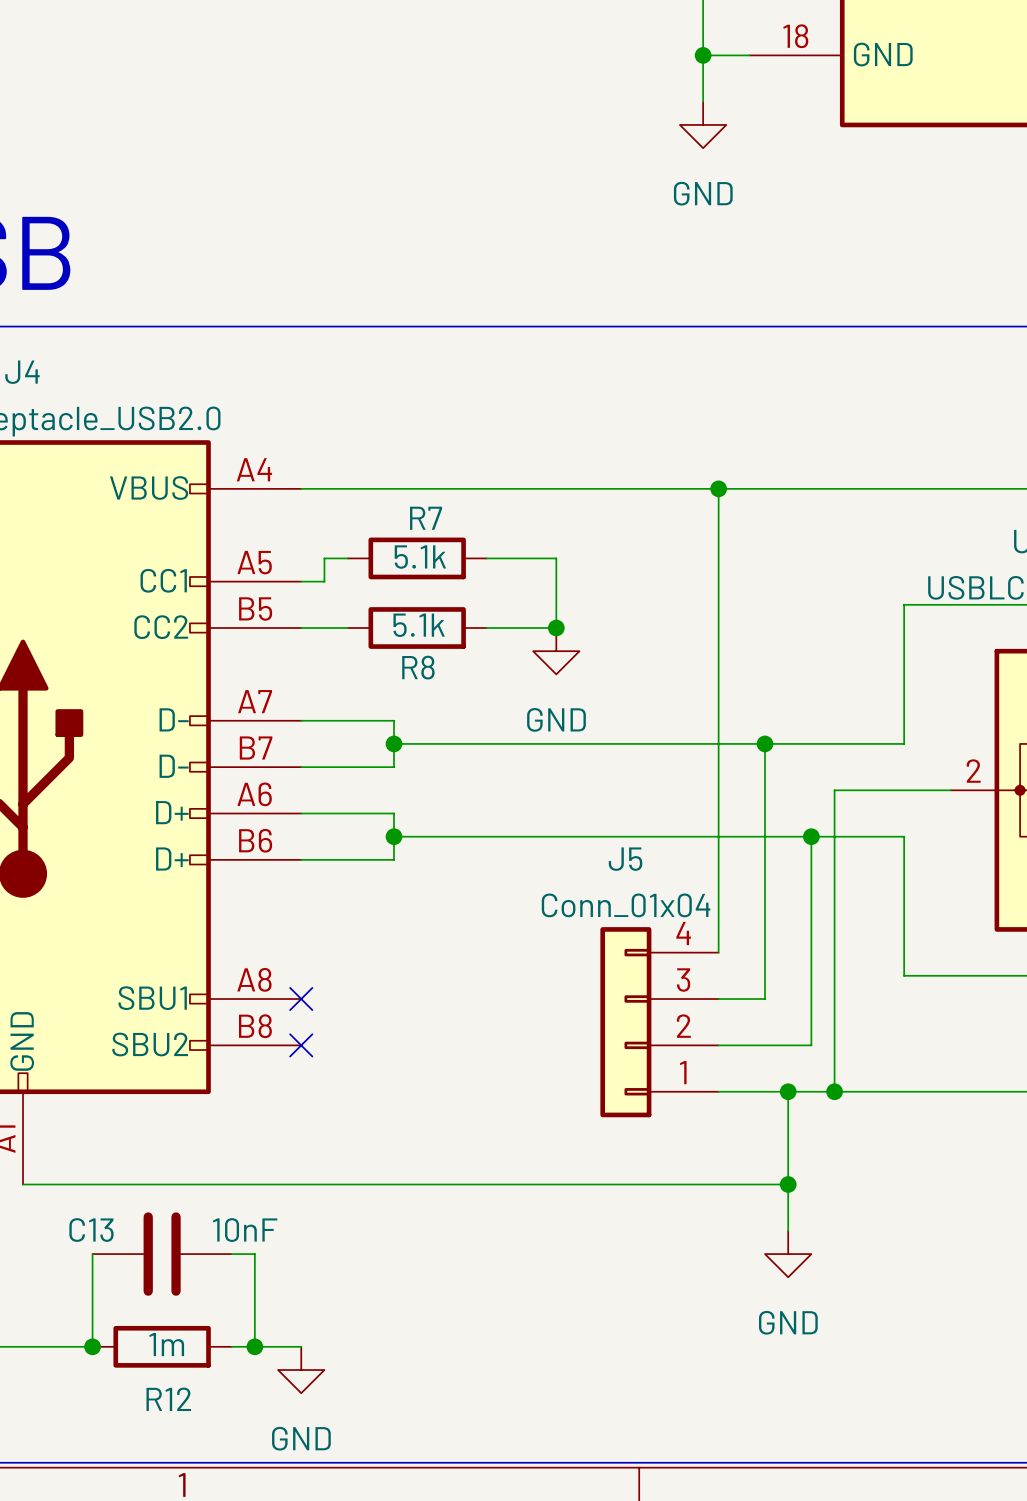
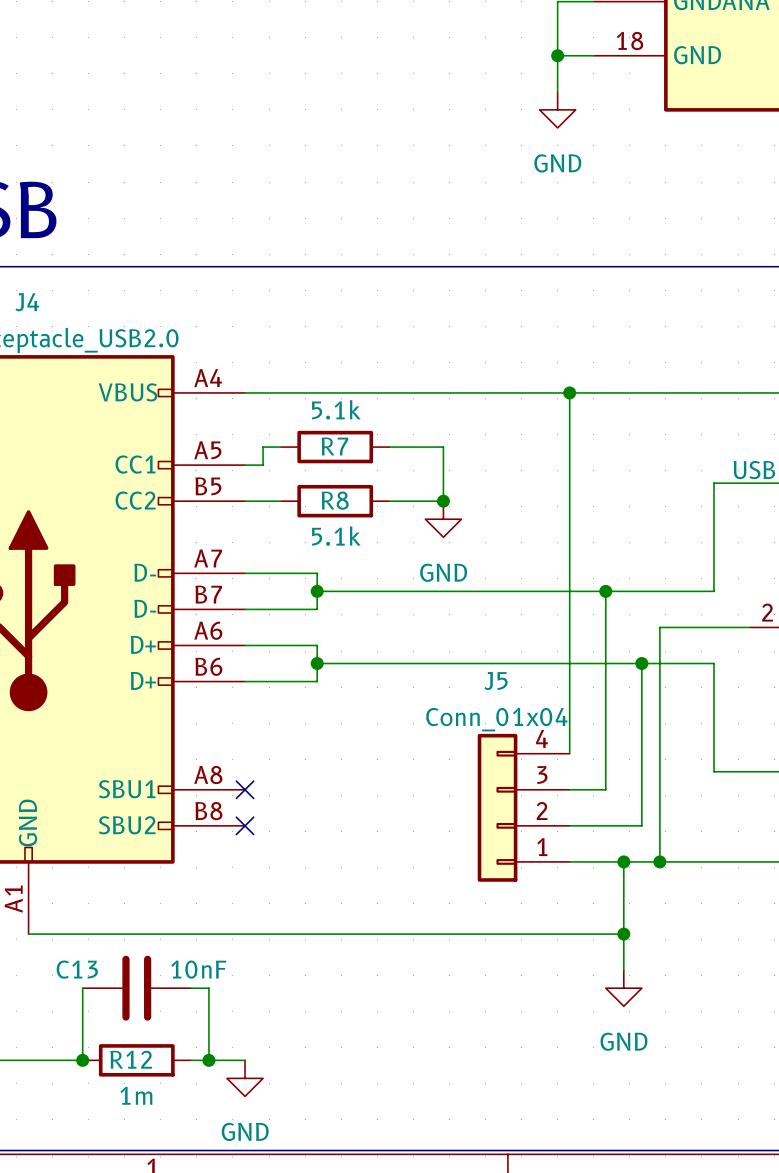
R7 name position: R7 (426, 518) -> R7 (334, 446)
R7 value position: 5.1k (420, 557) -> 5.1k (336, 409)
R8 value position: 5.1k (419, 625) -> 5.1k (336, 536)
R8 name position: R8 (418, 667) -> R8 (335, 500)
R12 value position: 1m (166, 1344) -> 1m (136, 1095)
R12 name position: R12 (168, 1399) -> R12 (131, 1059)

